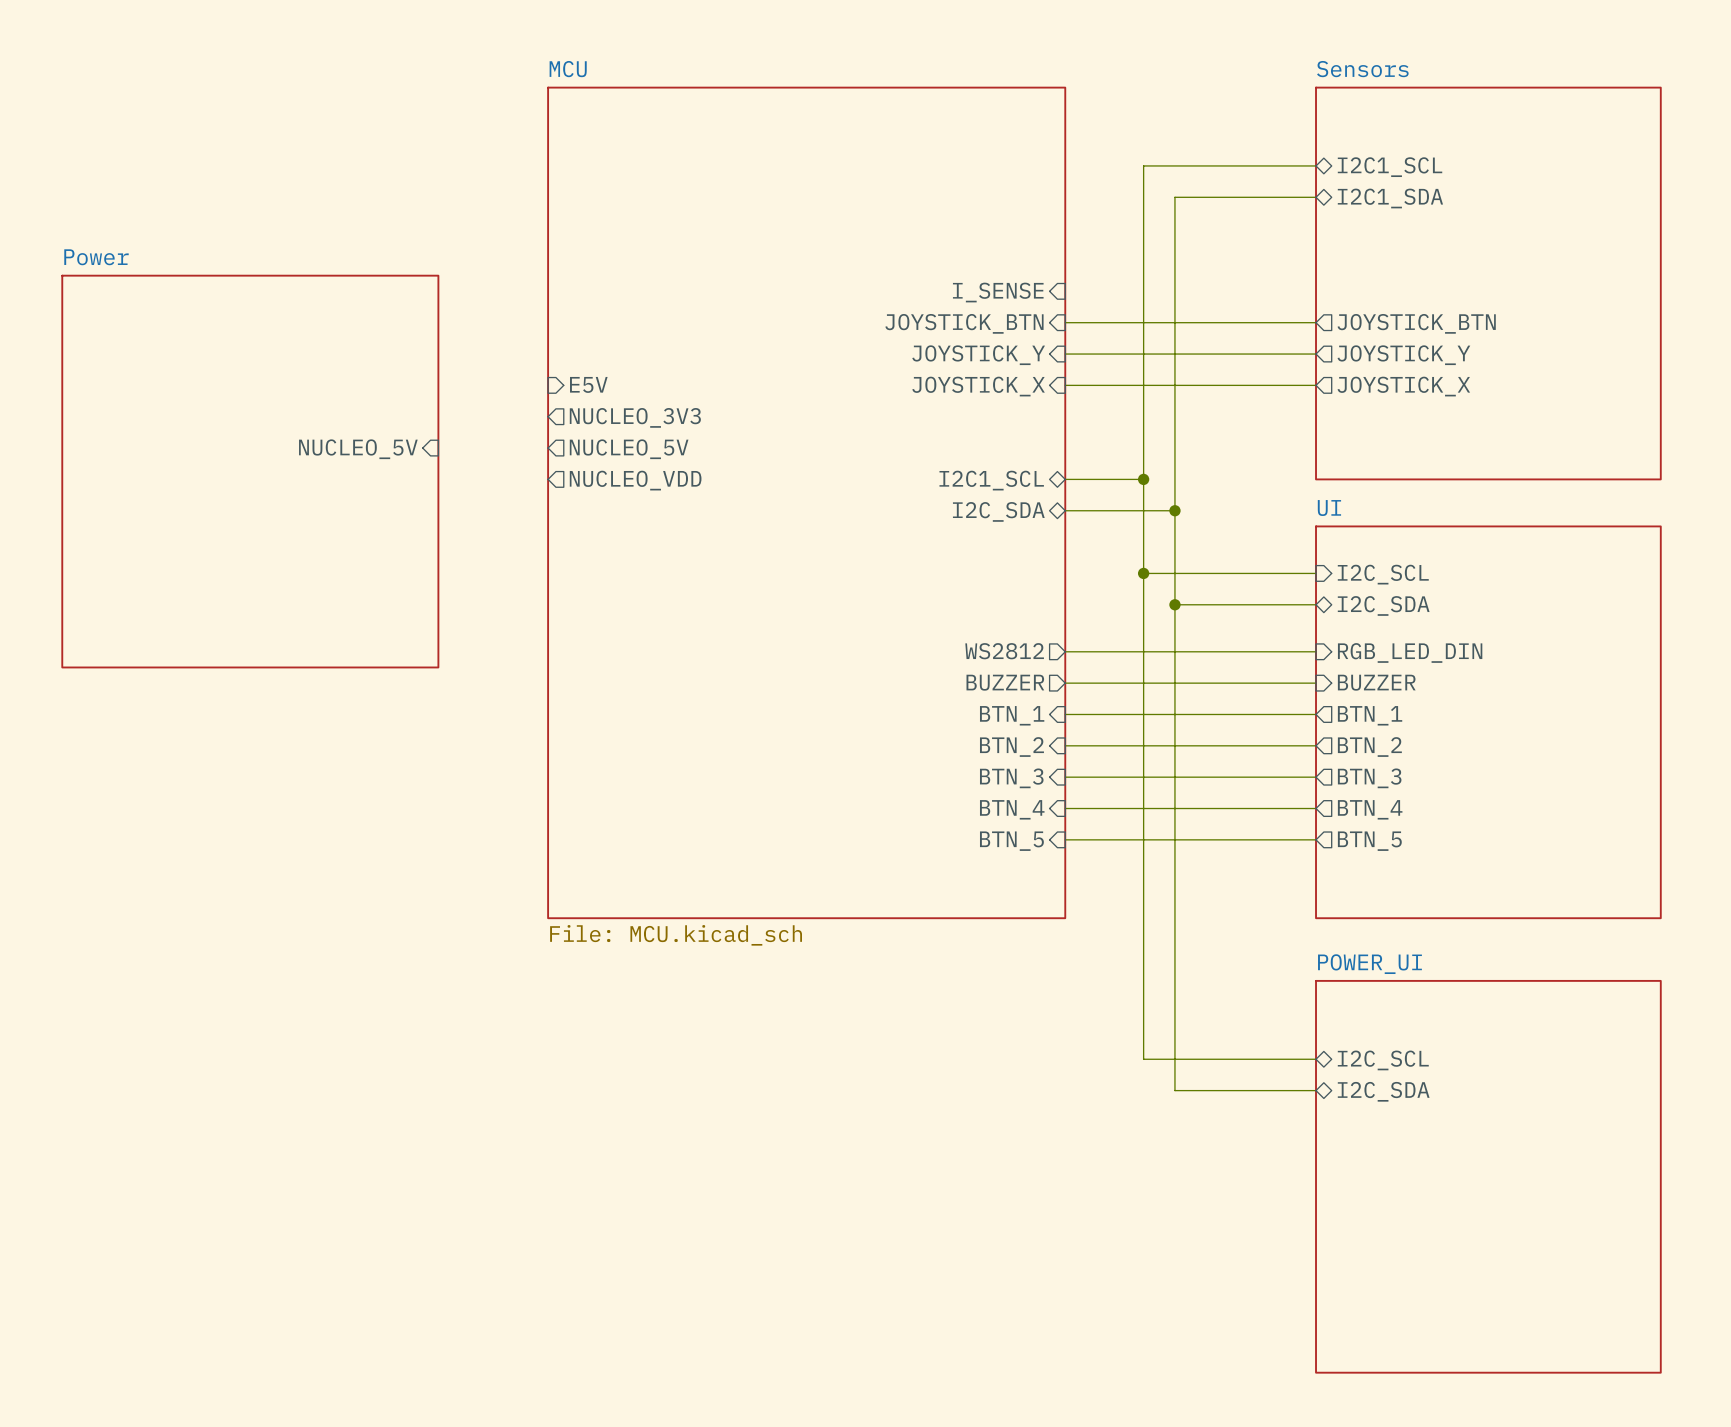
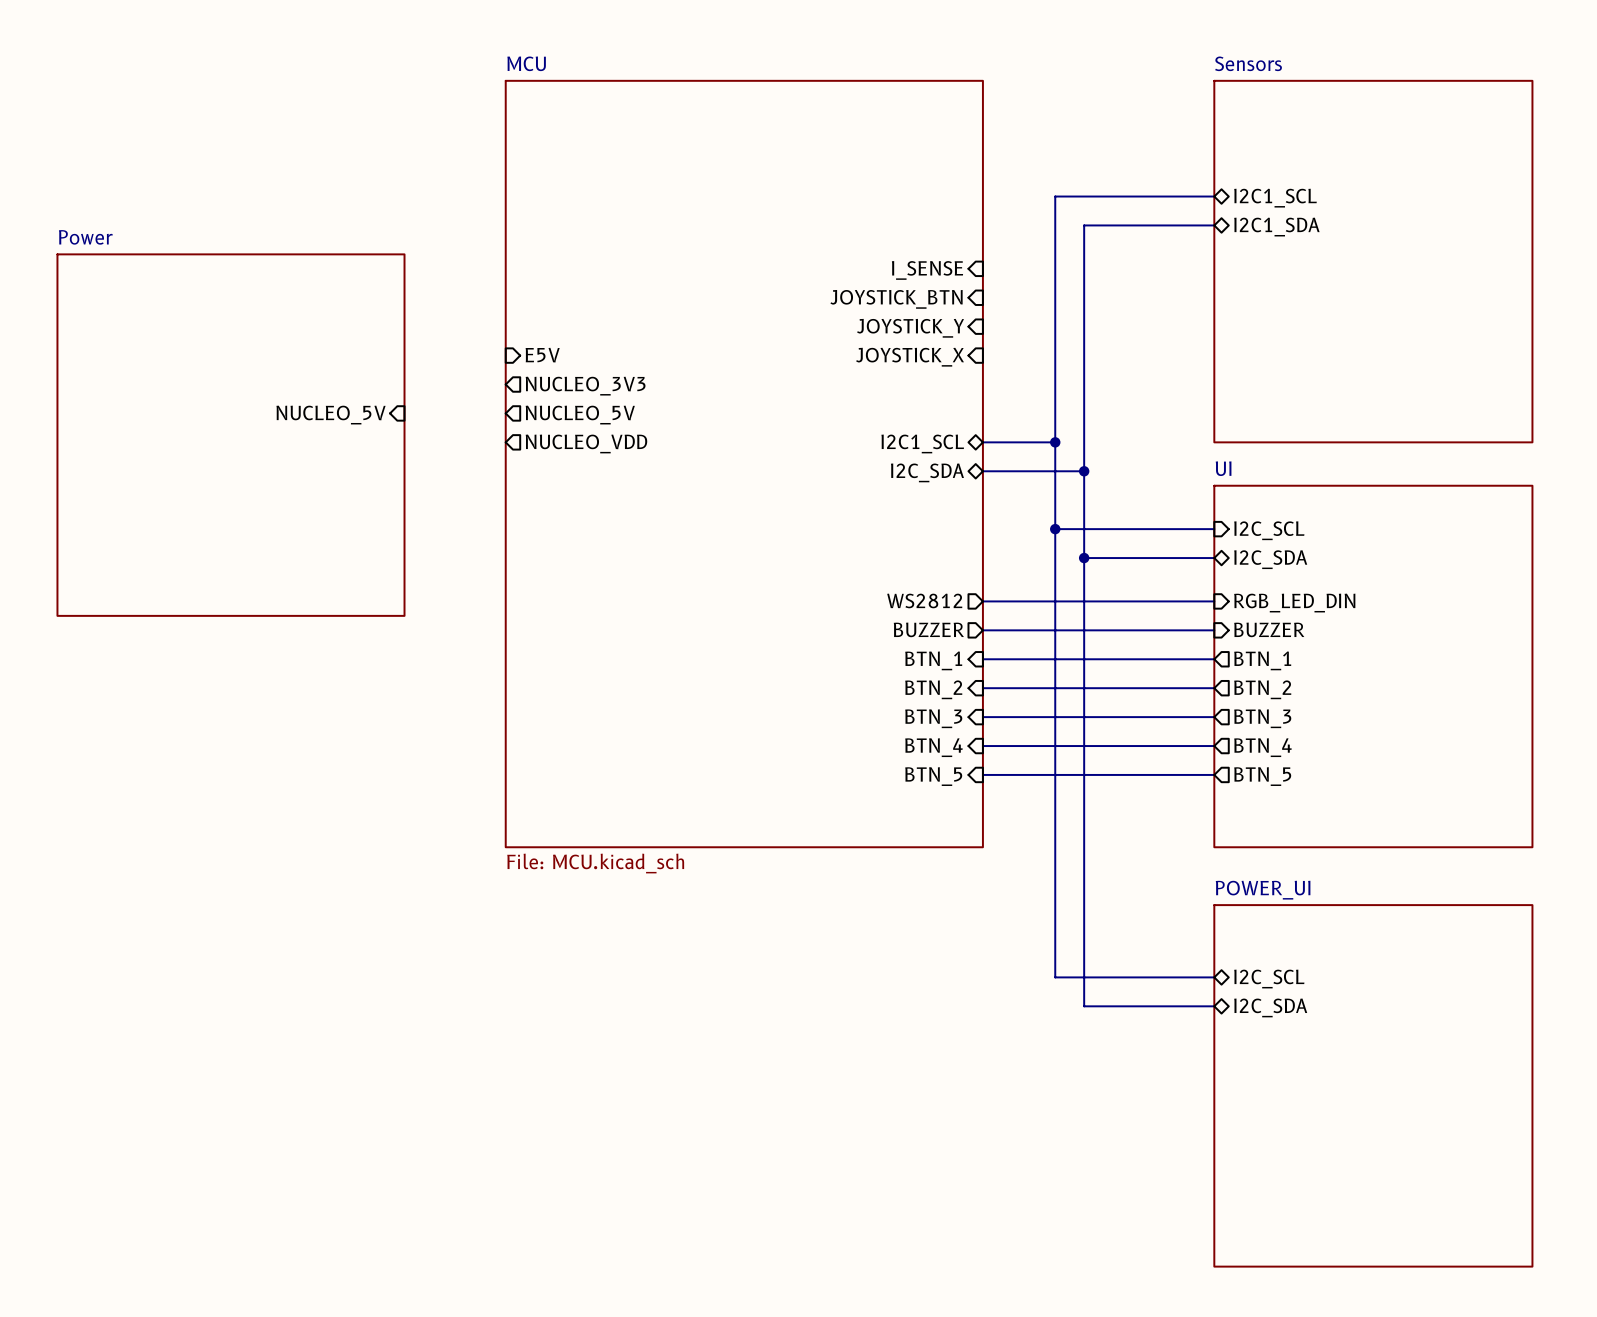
wire: (1316, 165) (1143, 165) (1143, 212) -> (1214, 196) (1055, 196)
sheet pin position: I2C1_SCL (1390, 167) -> I2C1_SCL (1275, 198)
wire: (1316, 197) (1174, 197) (1174, 244) -> (1214, 225) (1084, 225)
sheet pin position: I2C1_SDA (1390, 198) -> I2C1_SDA (1276, 227)
wire: (1065, 322) (1316, 322) -> none
sheet pin: JOYSTICK_BTN (1416, 323) -> none
wire: (1065, 354) (1316, 354) -> none
sheet pin: JOYSTICK_Y (1403, 355) -> none
wire: (1065, 385) (1316, 385) -> none
sheet pin: JOYSTICK_X (1403, 386) -> none

